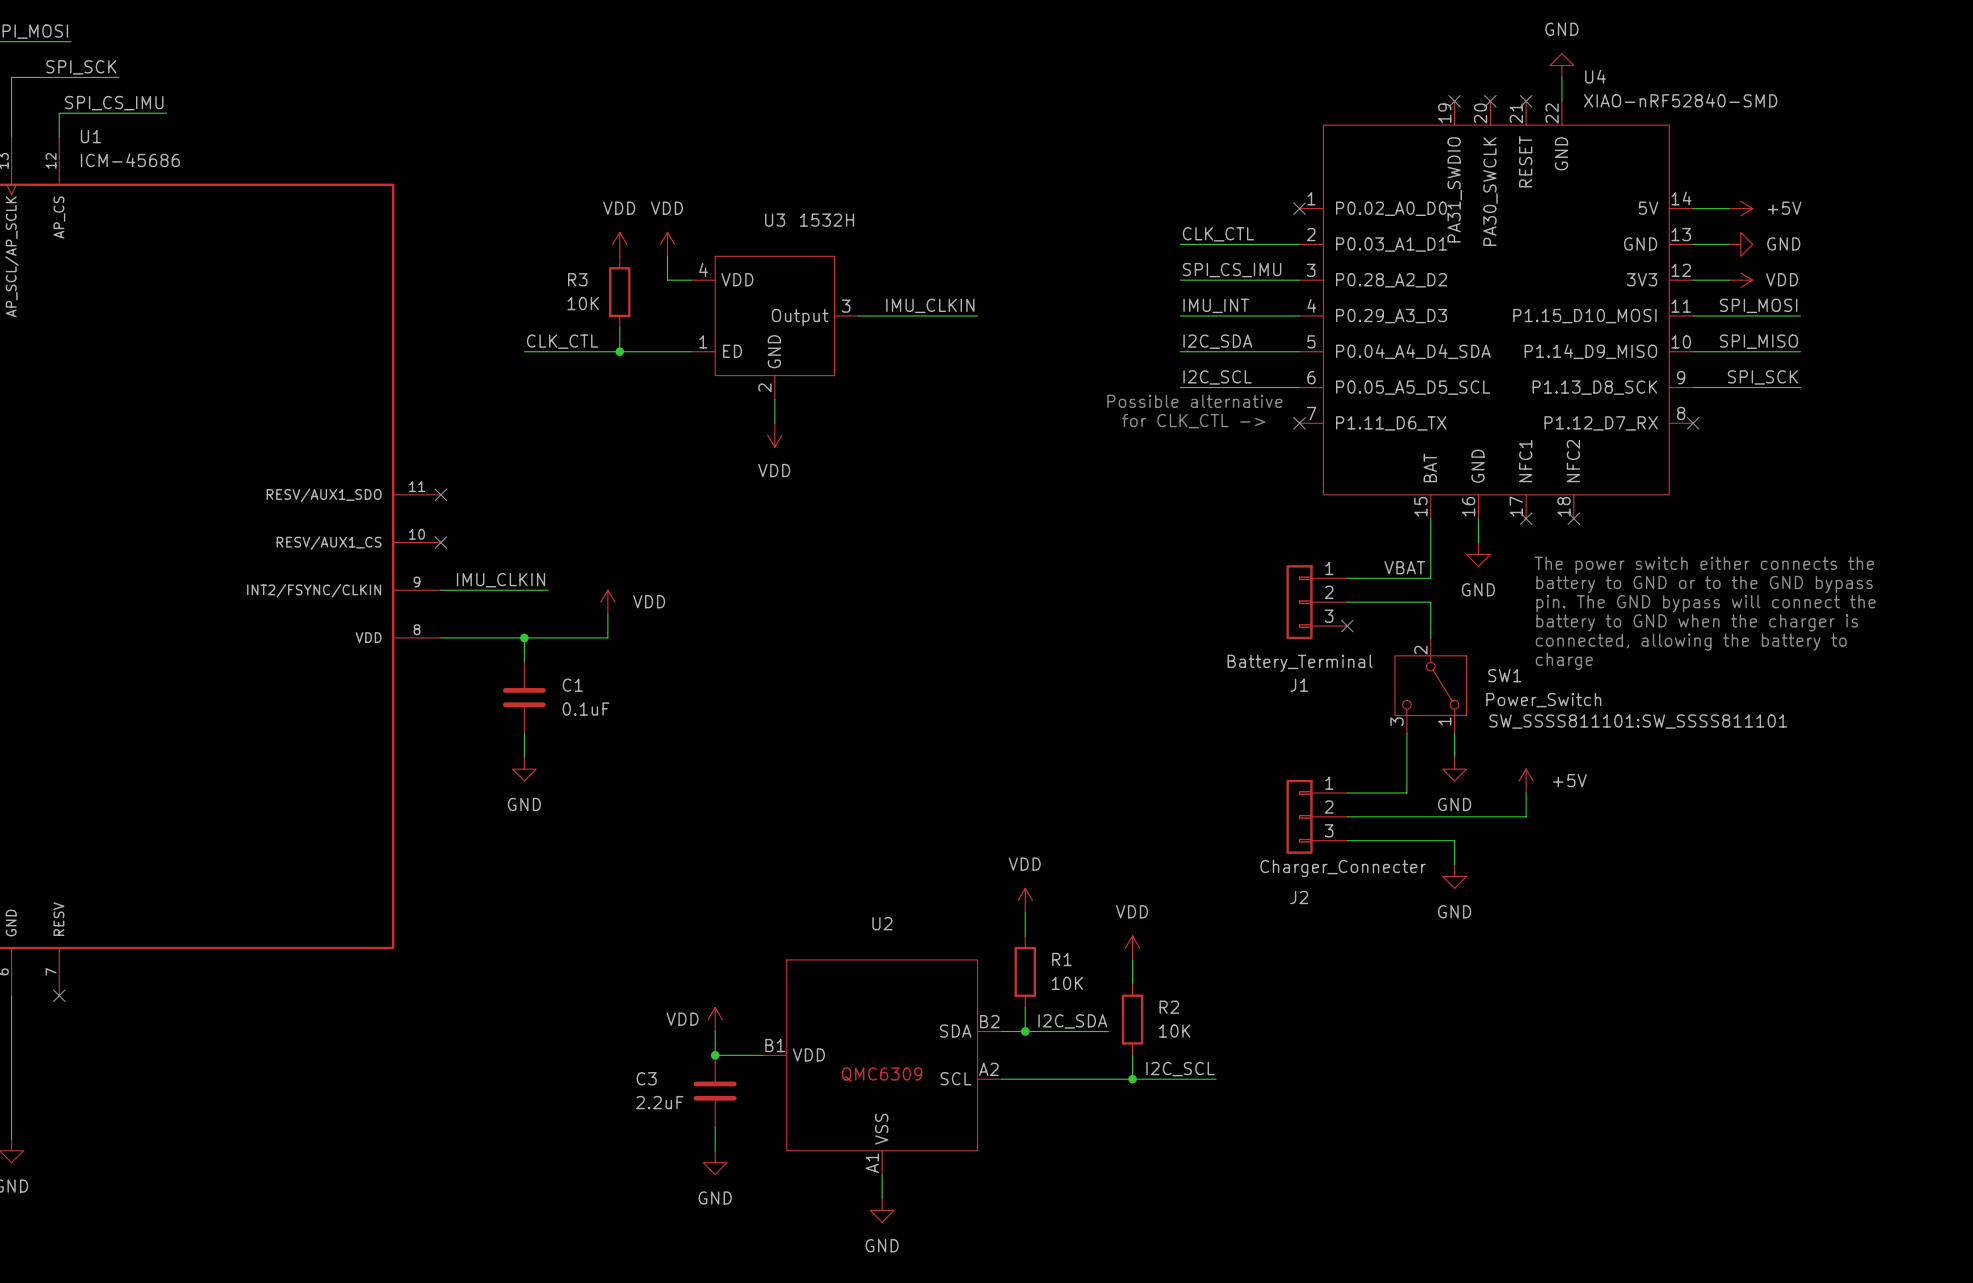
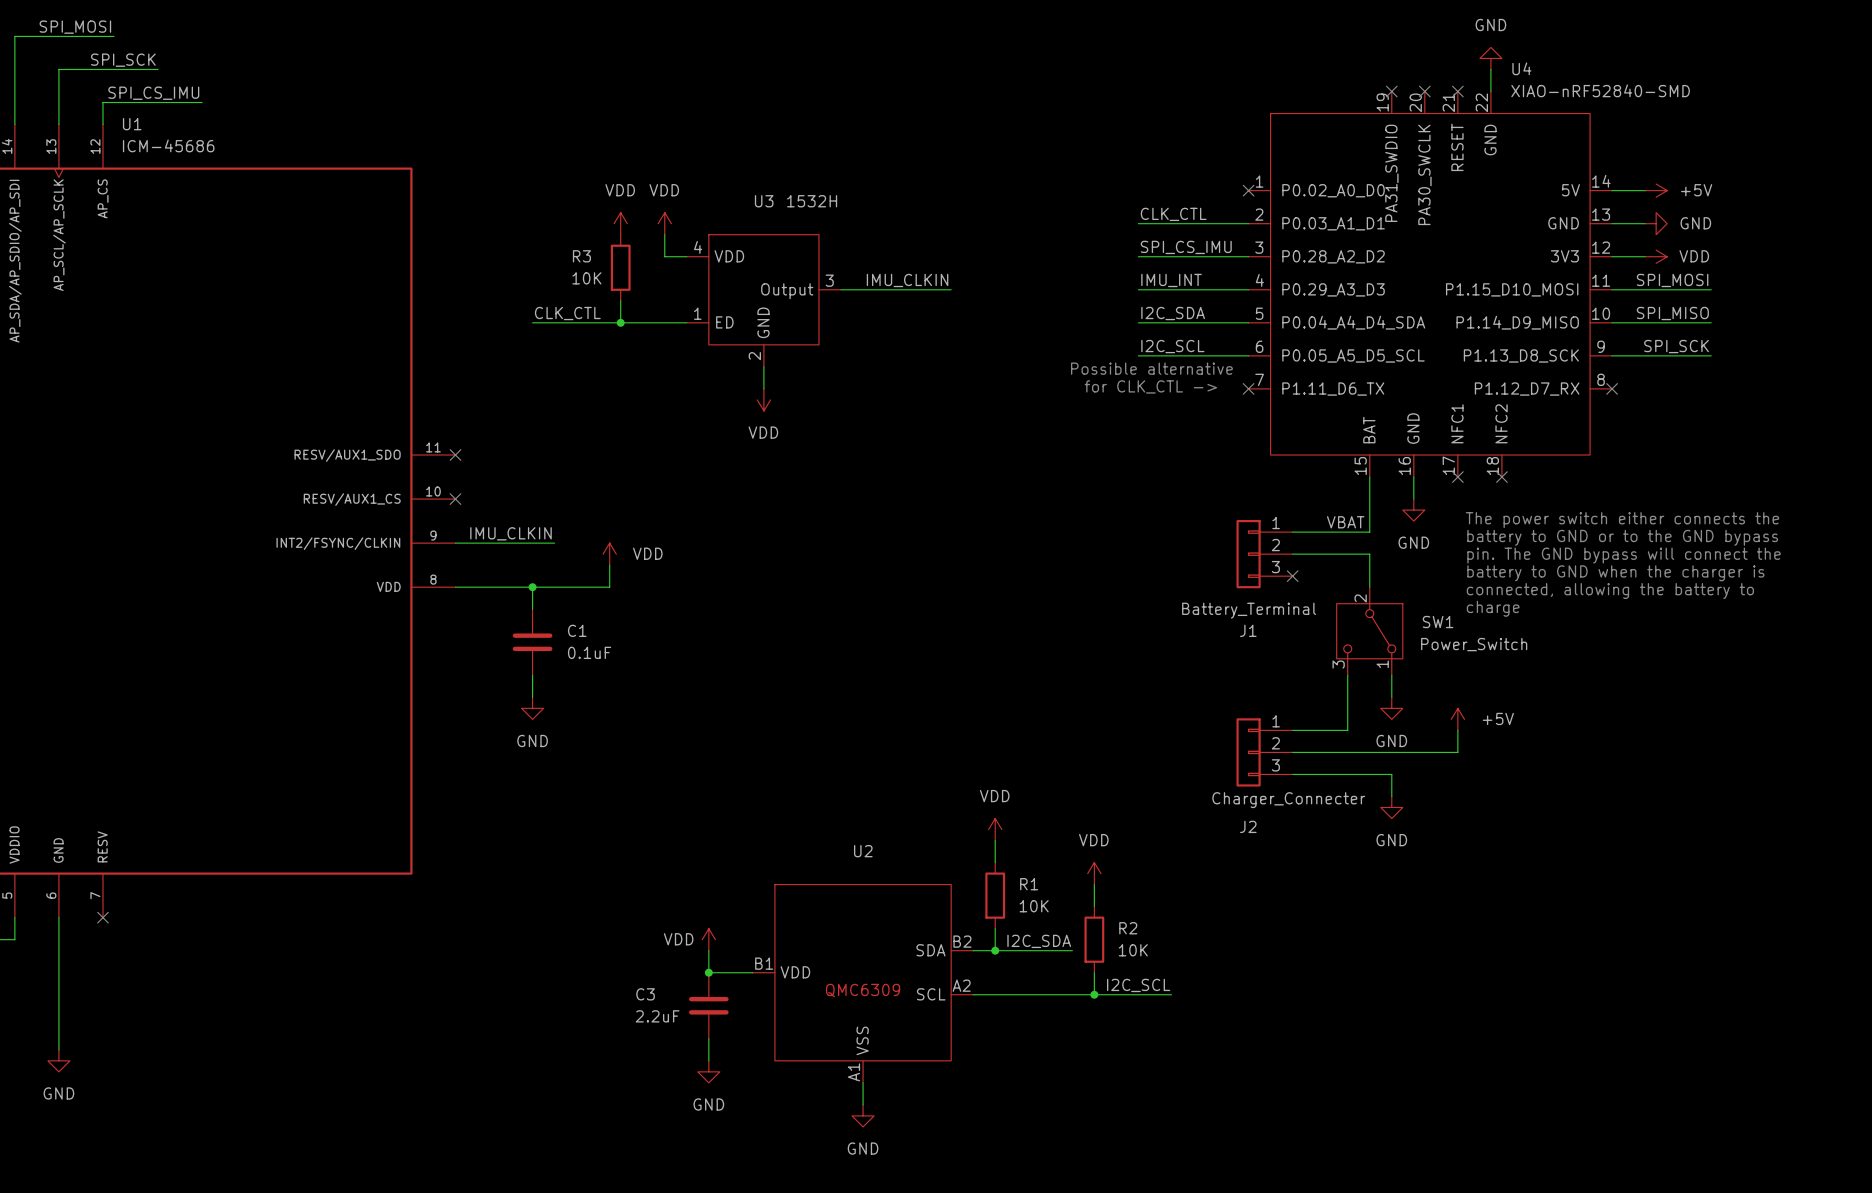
SW1 text: SW_SSSS811101:SW_SSSS811101 (1638, 721) -> none

